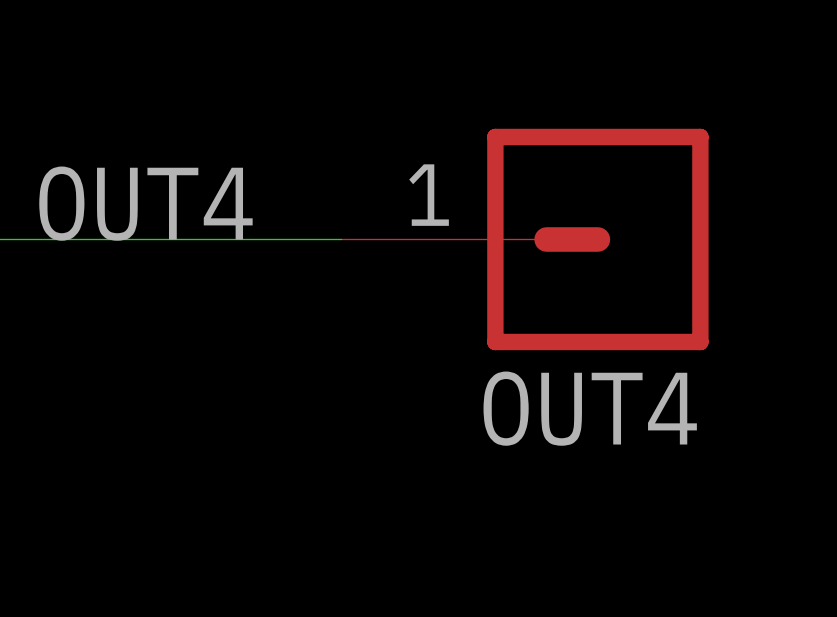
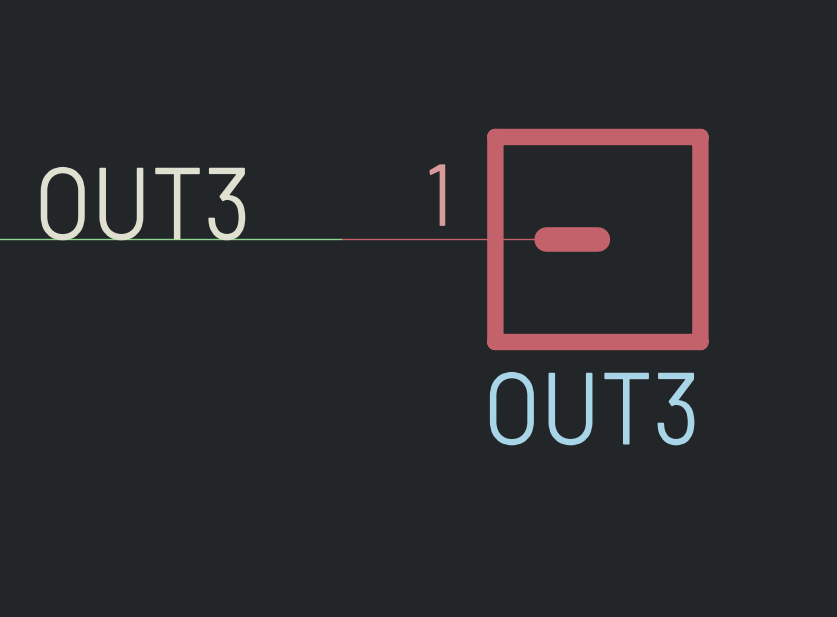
label: OUT4 (145, 203) -> OUT3 (143, 203)
OUT4 name: OUT4 (590, 408) -> OUT3 (592, 408)

